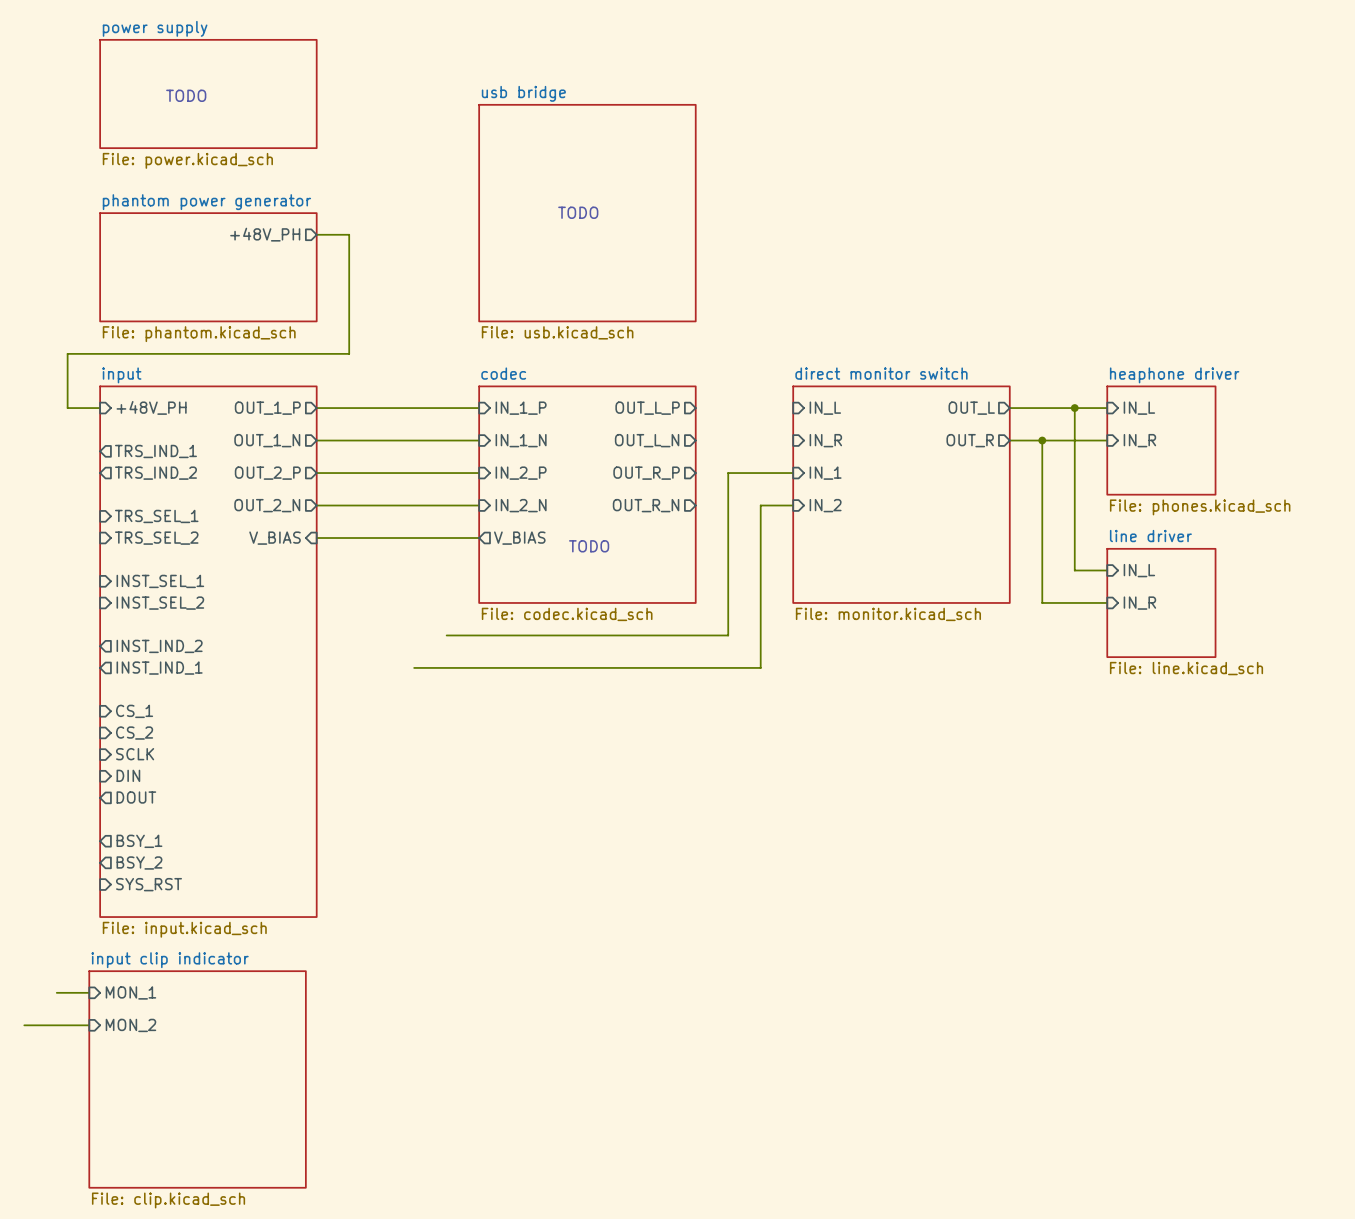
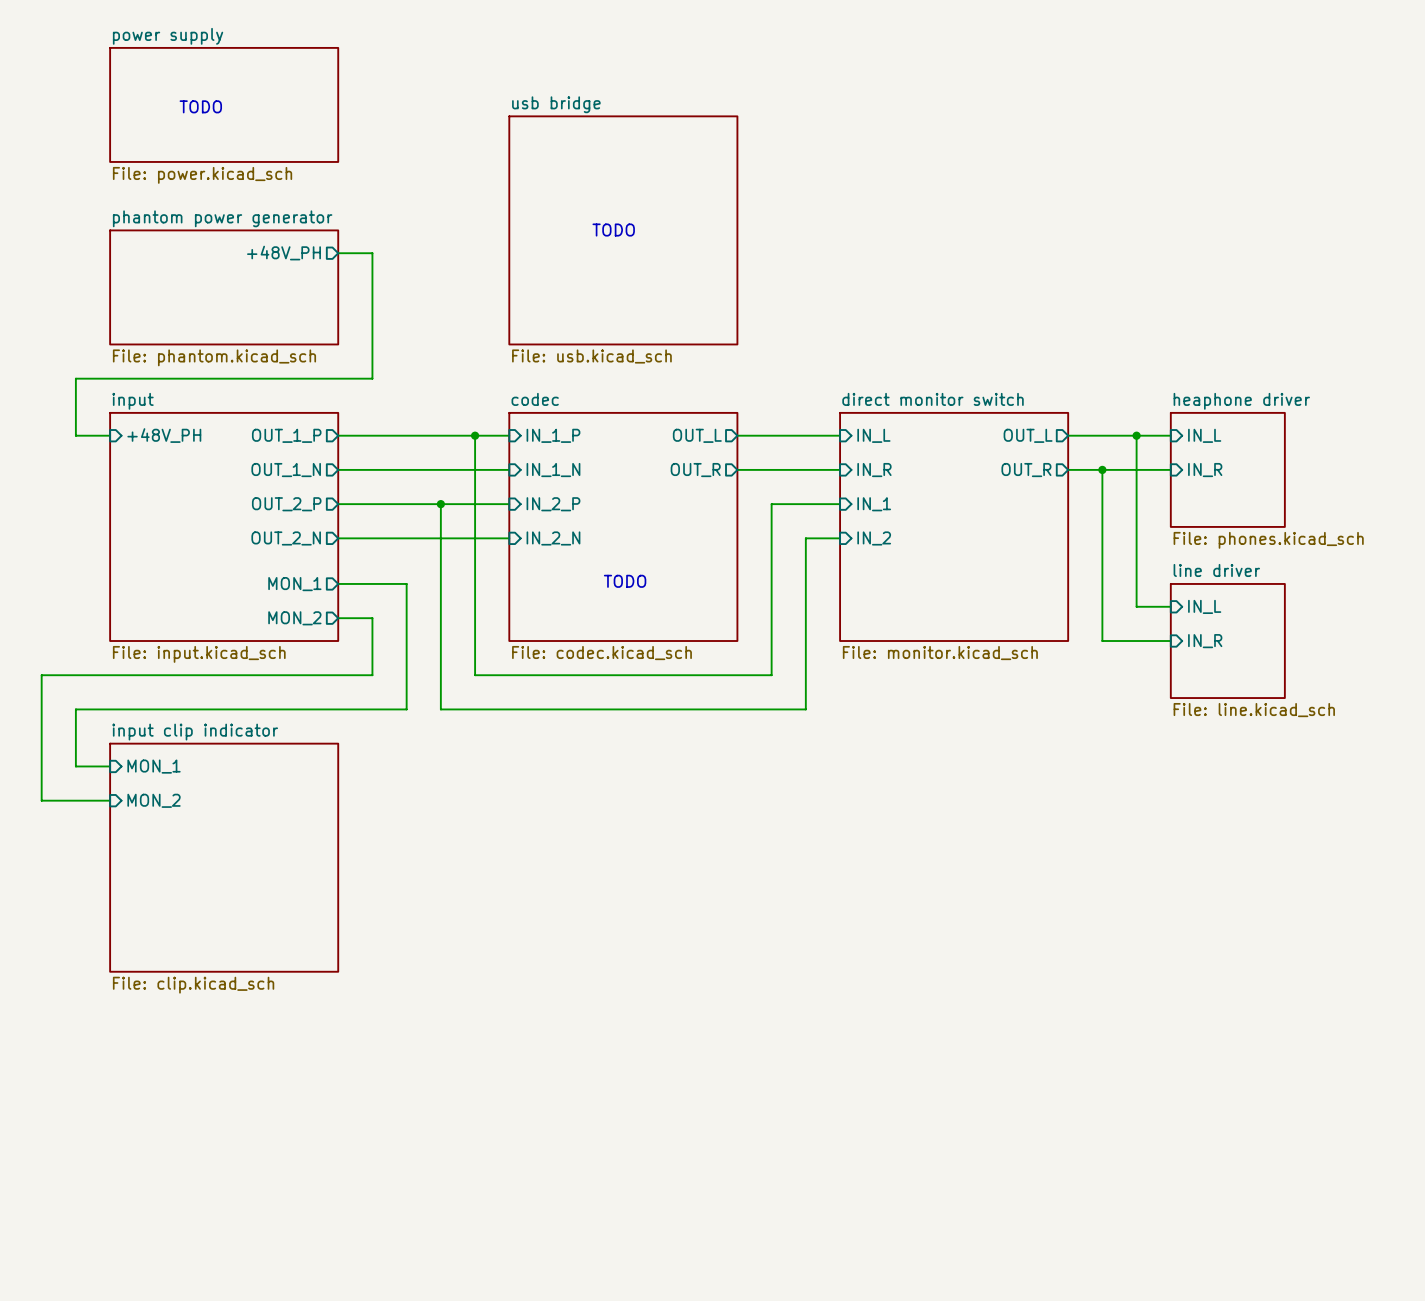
wire: none -> (475, 435) (475, 675)
junction: none -> (475, 435)
sheet pin: OUT_L_P (647, 408) -> OUT_L (697, 435)
wire: none -> (737, 435) (840, 435)
sheet pin: OUT_L_N (647, 440) -> OUT_R (695, 470)
wire: none -> (737, 469) (840, 469)
sheet pin: TRS_IND_1 (155, 451) -> none
sheet pin: TRS_IND_2 (155, 473) -> none
wire: none -> (440, 504) (440, 709)
junction: none -> (440, 504)
sheet pin: OUT_R_P (646, 473) -> none
sheet input: none -> File: input.kicad_sch (224, 526)
sheet pin: OUT_R_N (646, 505) -> none
sheet pin: TRS_SEL_1 (156, 516) -> none
sheet pin: TRS_SEL_2 (156, 538) -> none
sheet pin: V_BIAS (275, 538) -> none
wire: (316, 538) (479, 538) -> none
sheet pin: V_BIAS (519, 538) -> none
sheet pin: none -> MON_1 (294, 584)
wire: none -> (338, 583) (406, 583) (406, 709) (75, 709) (75, 766) (110, 766)
sheet pin: INST_SEL_1 (160, 581) -> none
sheet pin: none -> MON_2 (294, 618)
wire: none -> (338, 618) (372, 618) (372, 675) (41, 675) (41, 800) (110, 800)
sheet pin: INST_SEL_2 (160, 603) -> none
sheet pin: INST_IND_2 (159, 646) -> none
sheet input: File: input.kicad_sch (208, 651) -> none
sheet pin: INST_IND_1 (159, 668) -> none
sheet pin: CS_1 (134, 711) -> none
sheet pin: none -> MON_1 (154, 766)
sheet pin: CS_2 (134, 733) -> none
sheet pin: SCLK (135, 754) -> MON_2 (154, 800)
sheet pin: DIN (128, 775) -> none
sheet pin: DOUT (136, 797) -> none
sheet input clip indicator: none -> File: clip.kicad_sch (224, 857)
sheet pin: BSY_1 (139, 841) -> none
sheet pin: BSY_2 (139, 863) -> none
sheet pin: SYS_RST (149, 884) -> none
wire: (56, 992) (89, 992) -> none
sheet pin: MON_1 (130, 992) -> none
wire: (24, 1025) (89, 1025) -> none
sheet pin: MON_2 (130, 1025) -> none
sheet input clip indicator: File: clip.kicad_sch (197, 1079) -> none

